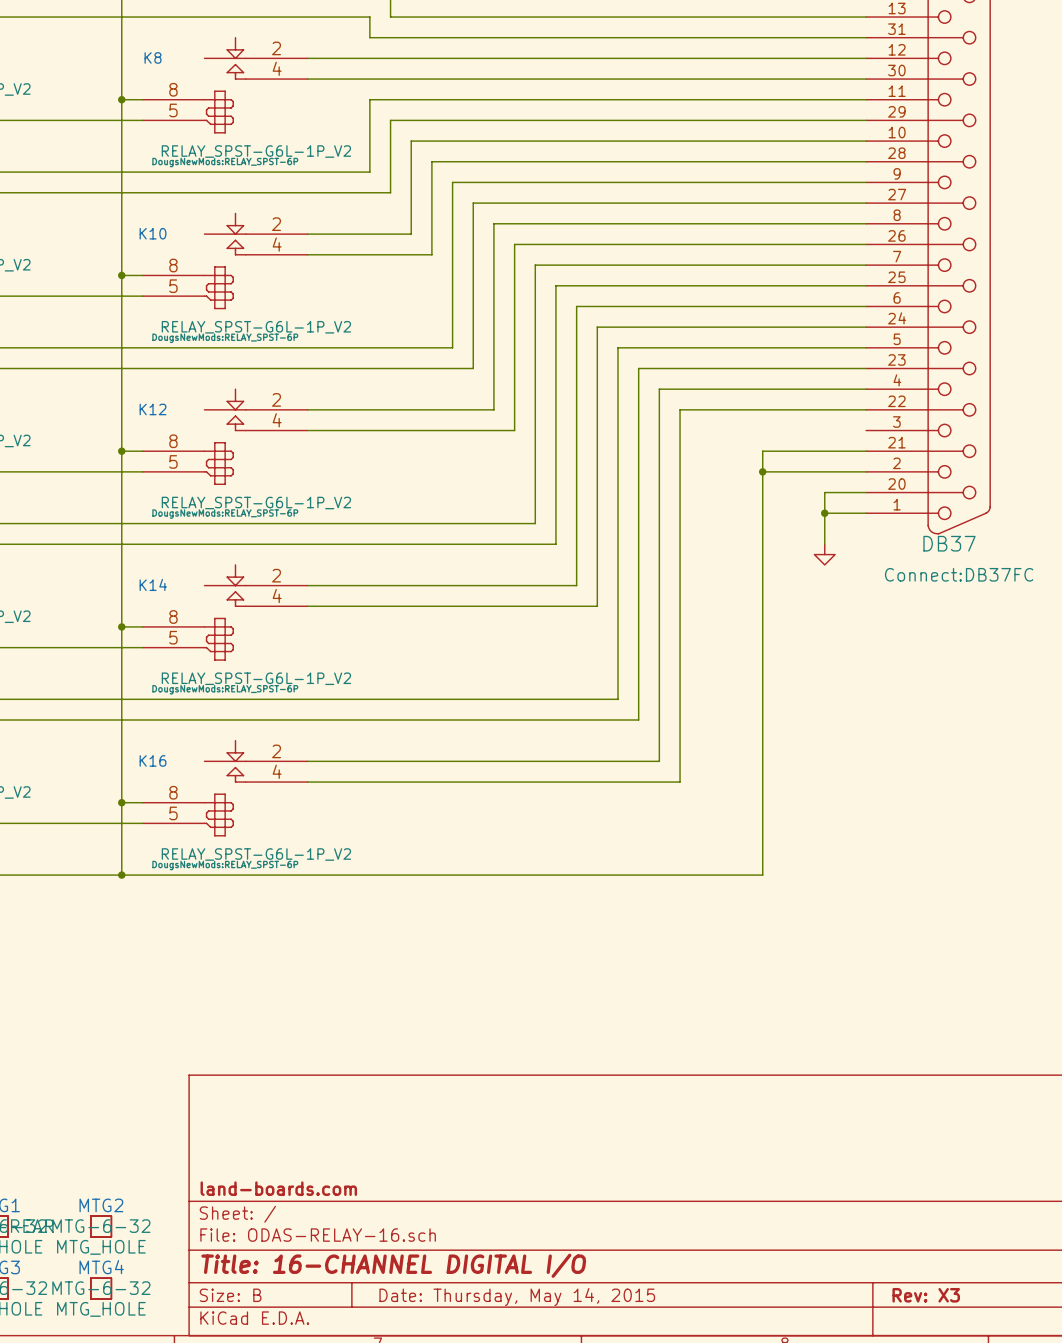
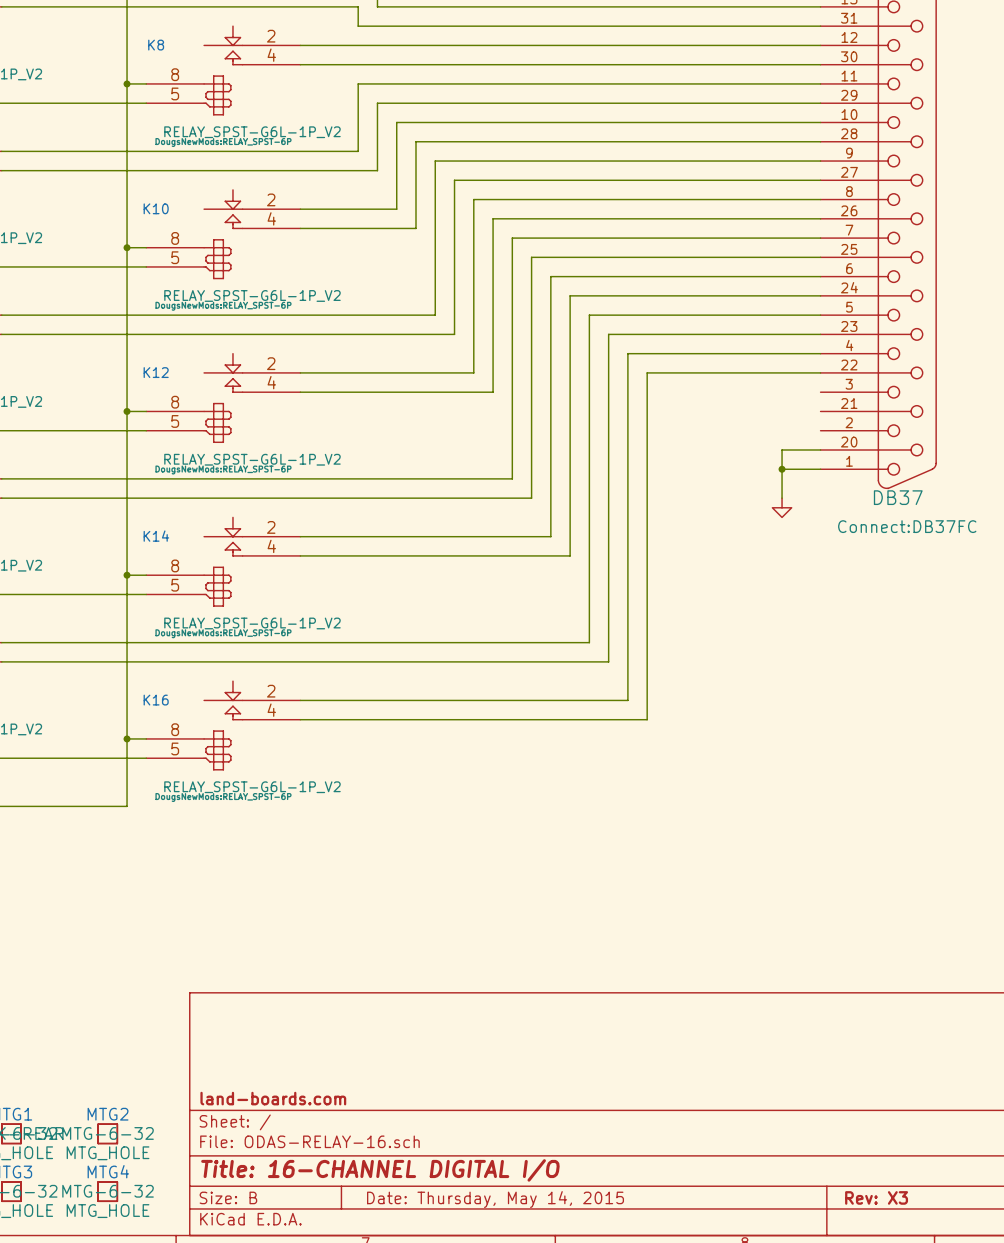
wire: (866, 451) (762, 451) (762, 875) (121, 875) -> none
wire: (762, 471) (866, 471) -> none
junction: (762, 471) -> none
junction: (121, 875) -> none

